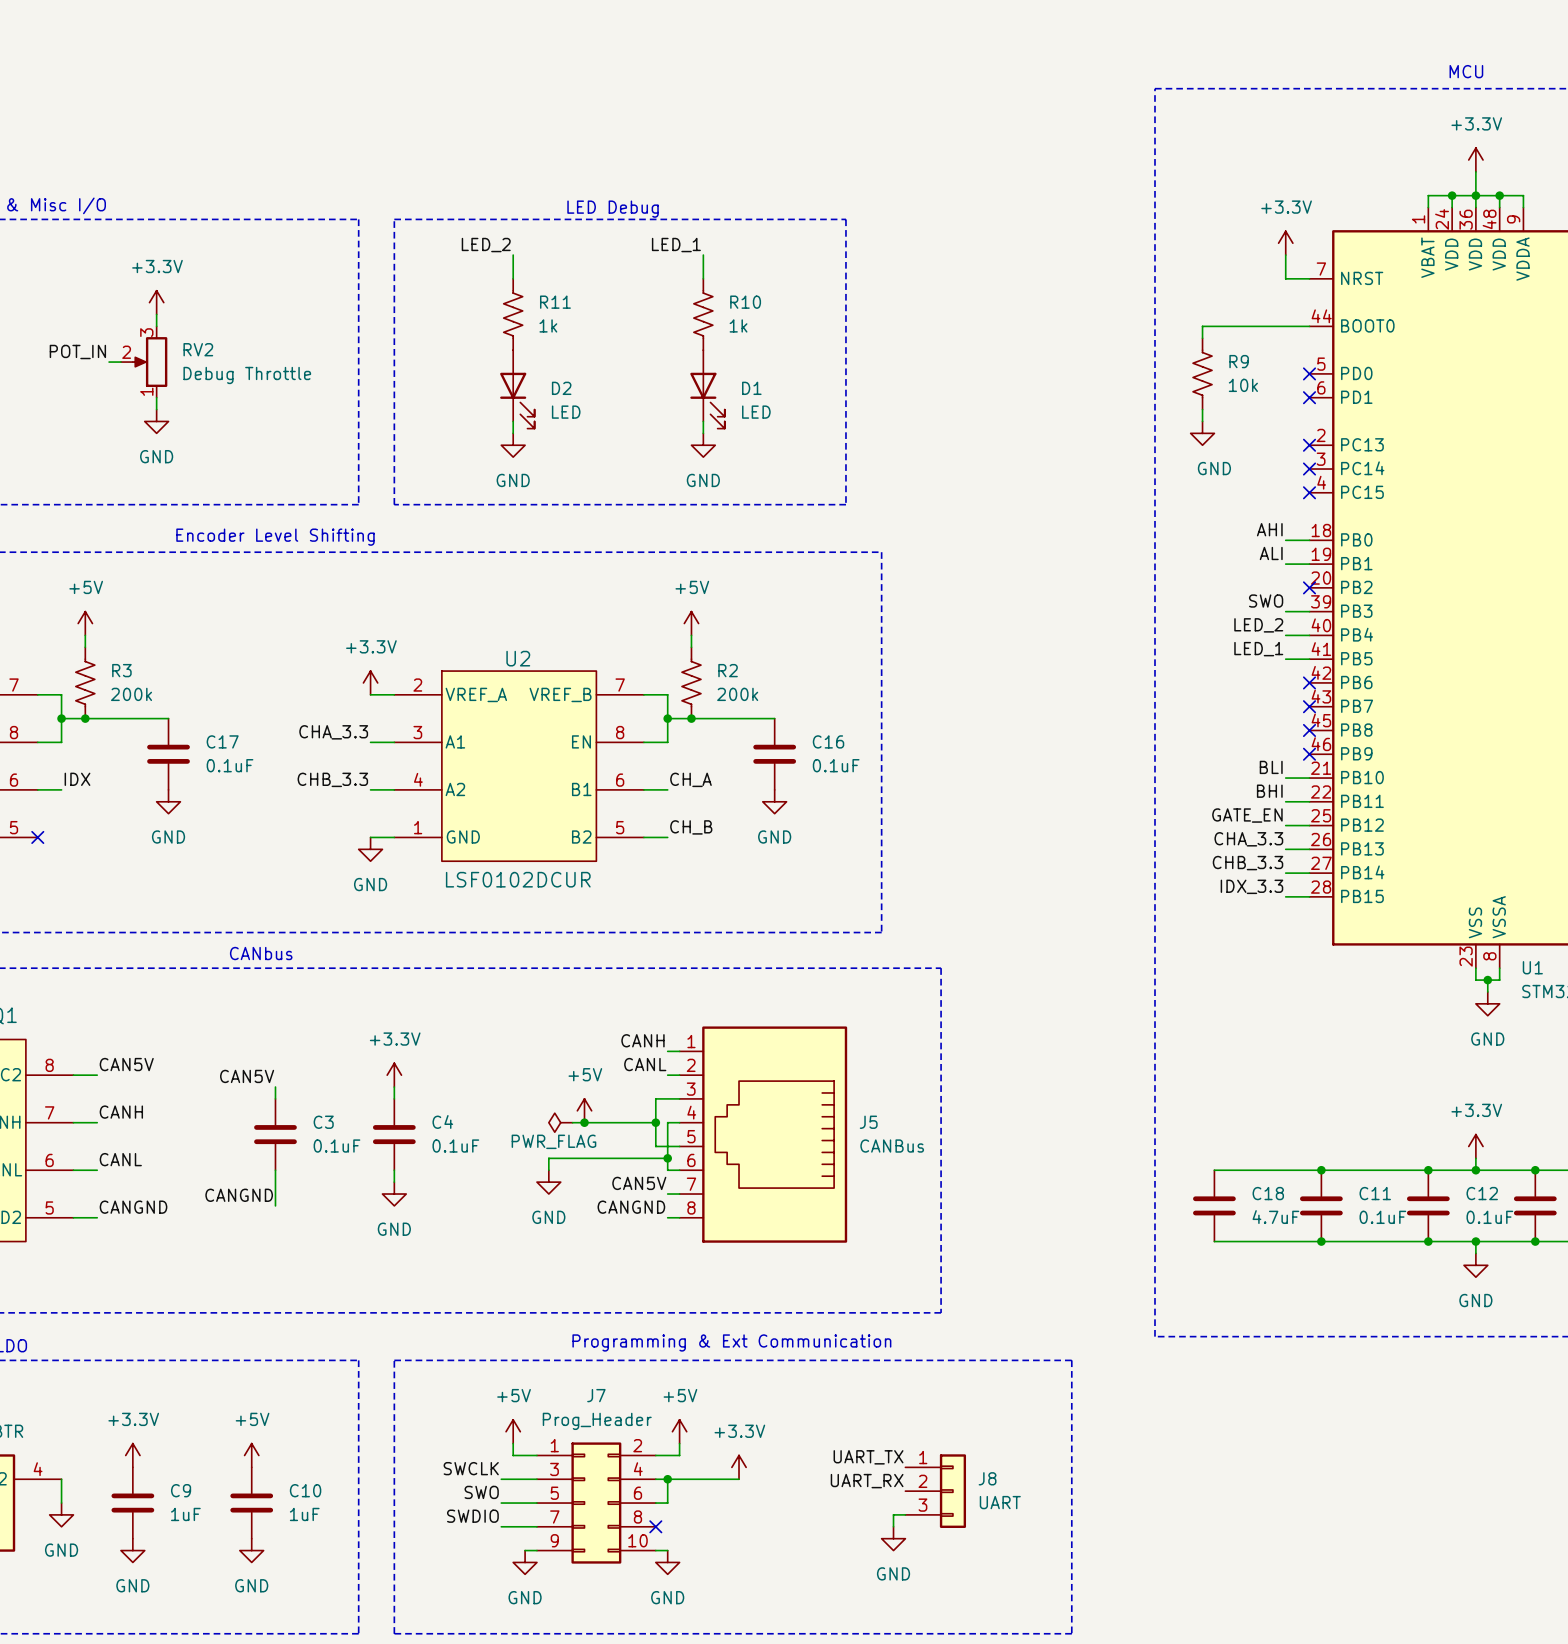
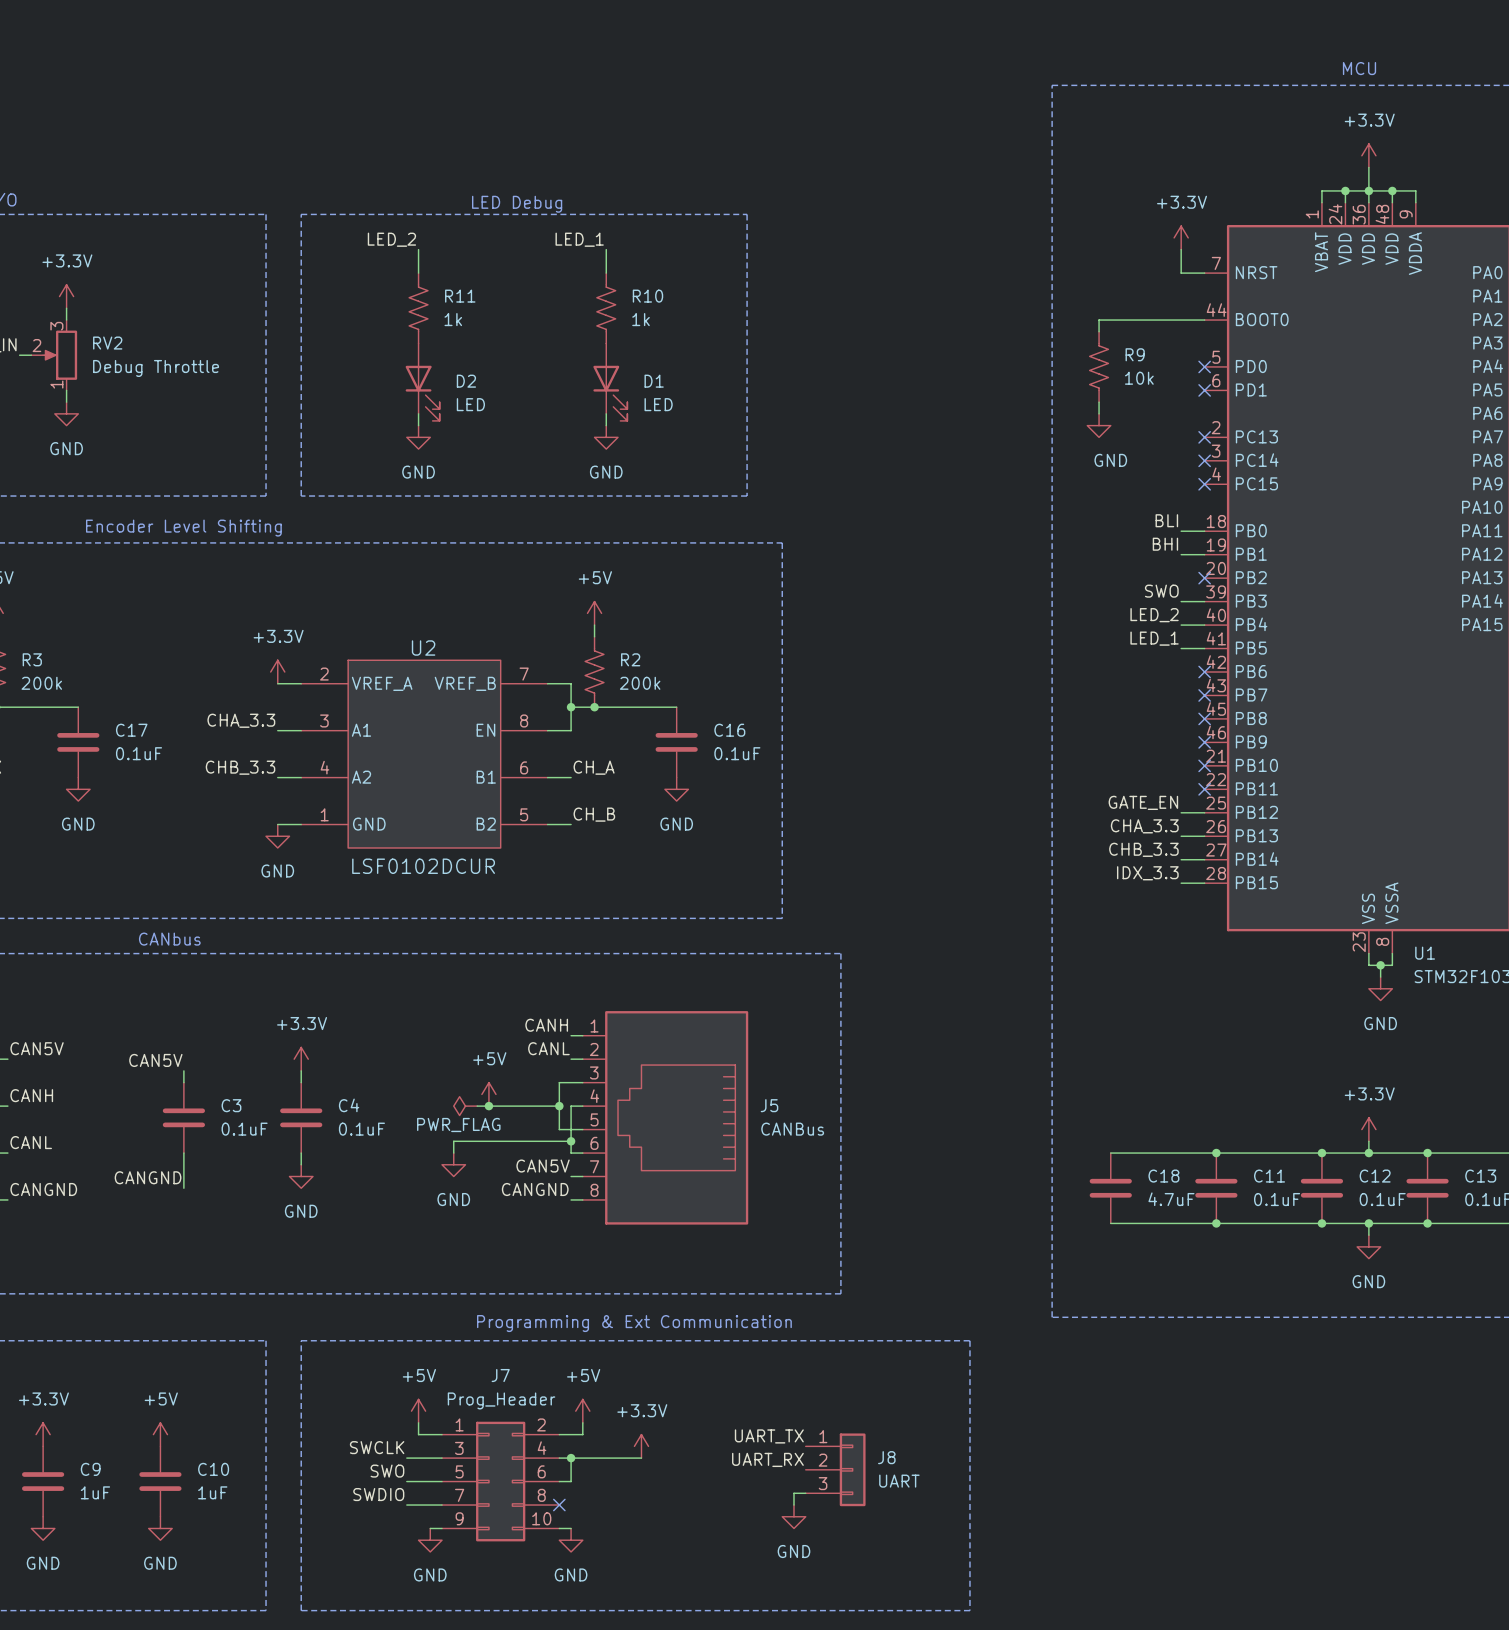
label: AHI (1269, 529) -> BLI (1166, 520)
label: ALI (1271, 553) -> BHI (1165, 544)
label: BLI (1271, 767) -> none
wire: (1285, 778) (1309, 778) -> none
no-connect mark: none -> (1204, 765)
label: BHI (1269, 791) -> none
wire: (1285, 801) (1309, 801) -> none
no-connect mark: none -> (1204, 789)

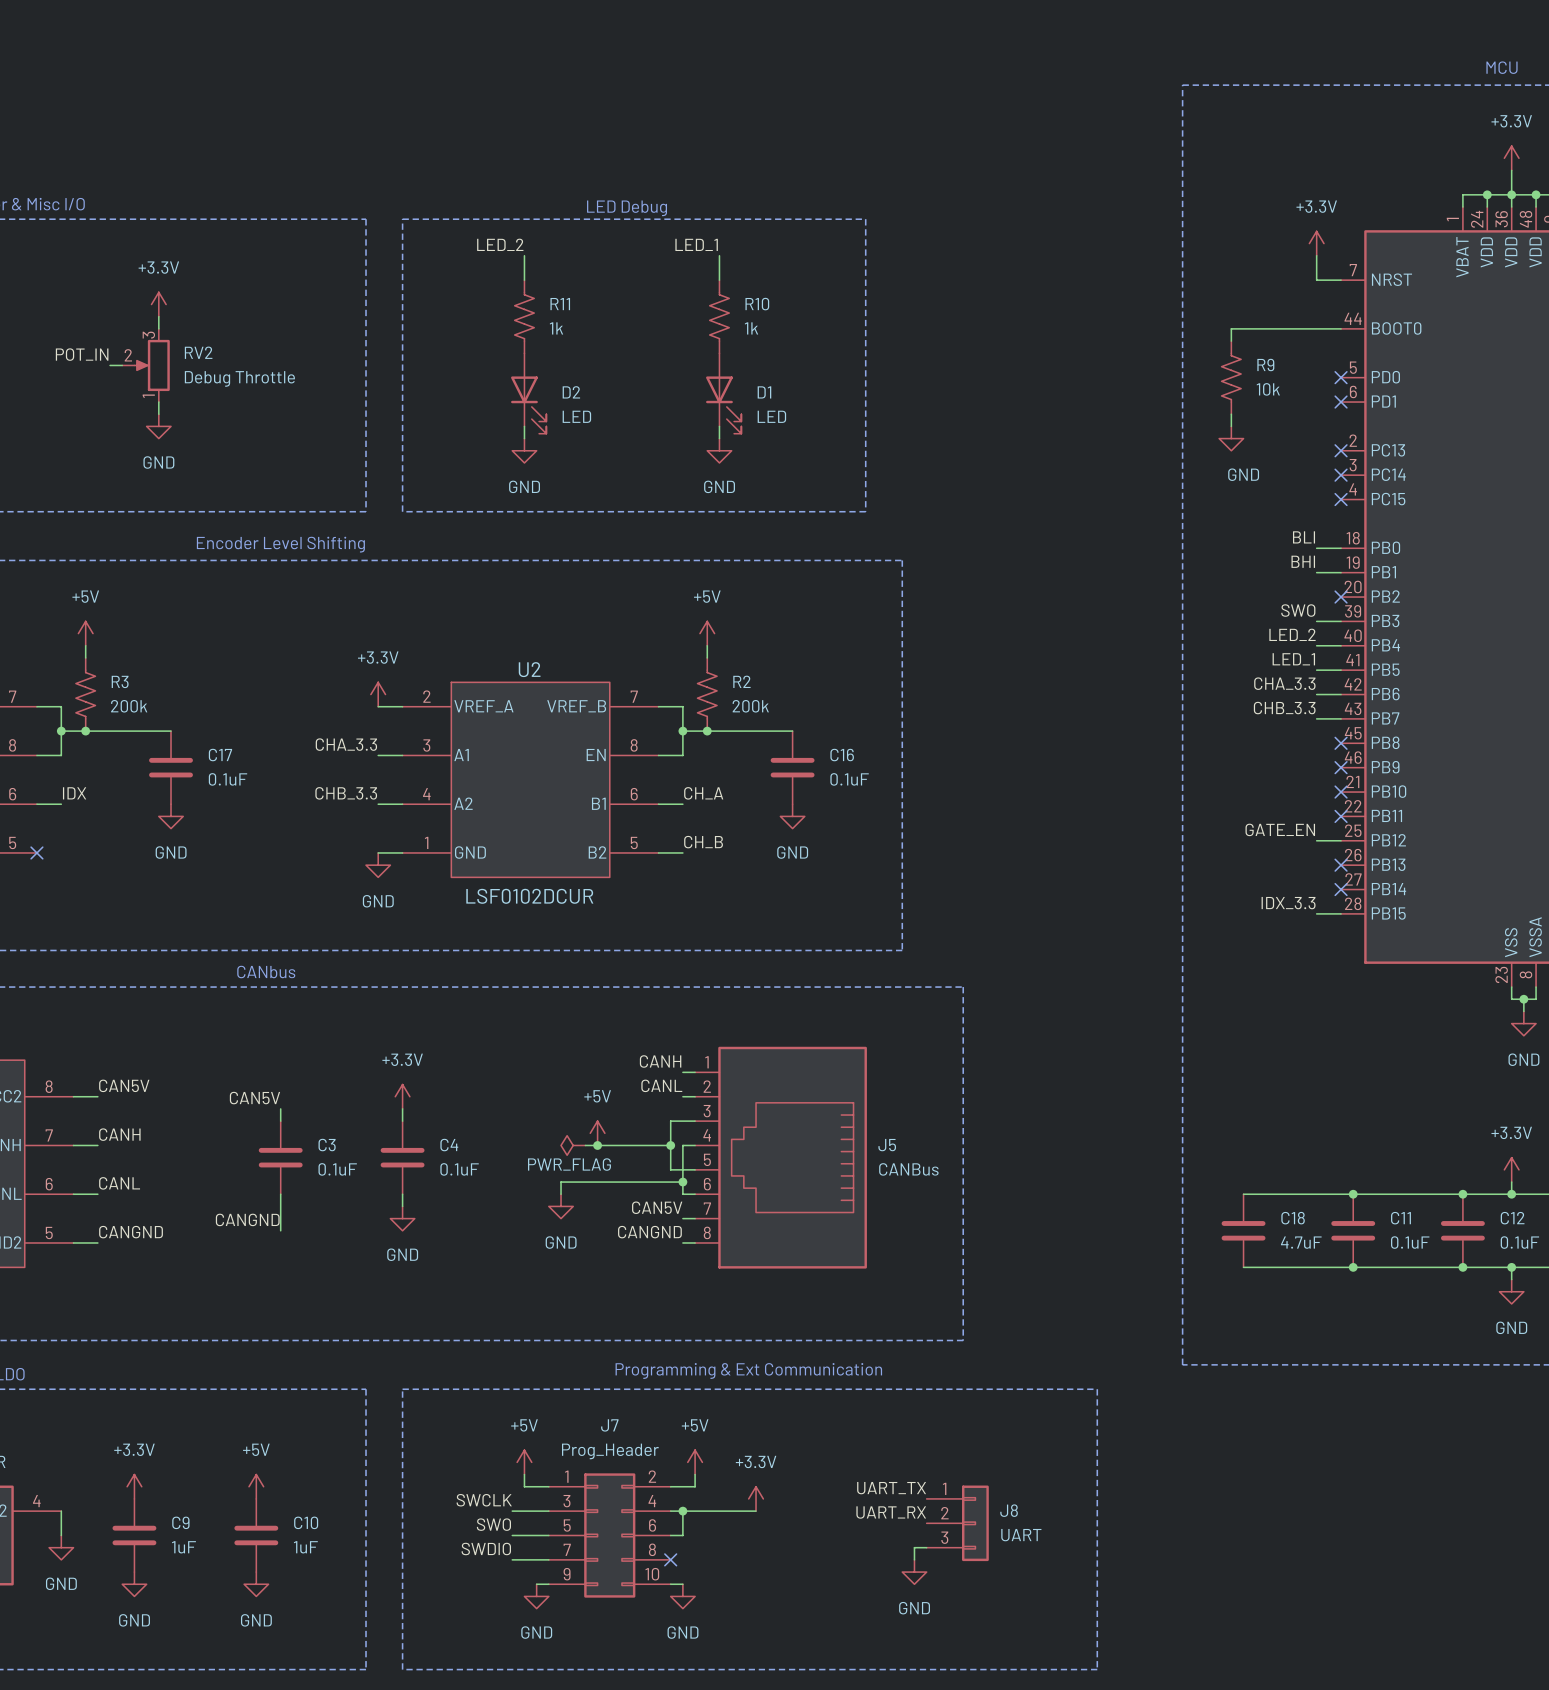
no-connect mark: (1204, 672) -> none
no-connect mark: (1204, 695) -> none
label position: CHA_3.3 (1144, 826) -> CHA_3.3 (1284, 683)
wire: (1181, 836) (1204, 836) -> (1316, 718) (1341, 718)
no-connect mark: none -> (1341, 865)
label position: CHB_3.3 (1143, 849) -> CHB_3.3 (1284, 708)
wire: (1181, 859) (1204, 859) -> (1316, 694) (1341, 694)
no-connect mark: none -> (1341, 889)

